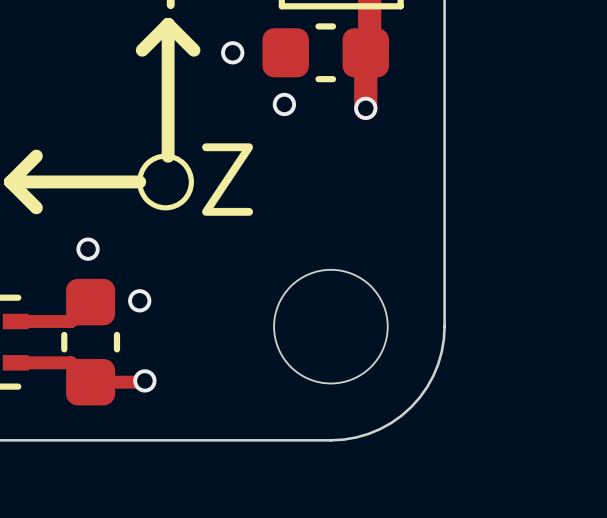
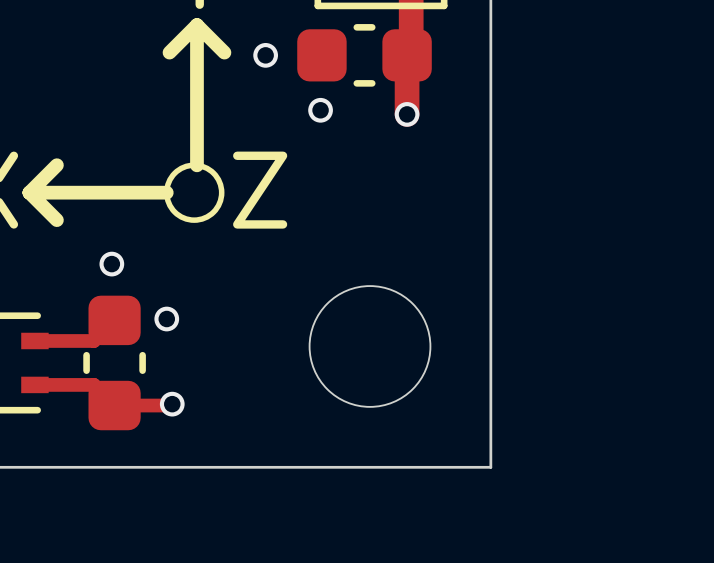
board edge: (444, 326) (441, 351) (433, 375) (411, 407) (380, 429) (356, 437) (330, 440) -> (490, 346) (490, 467) (370, 467)

